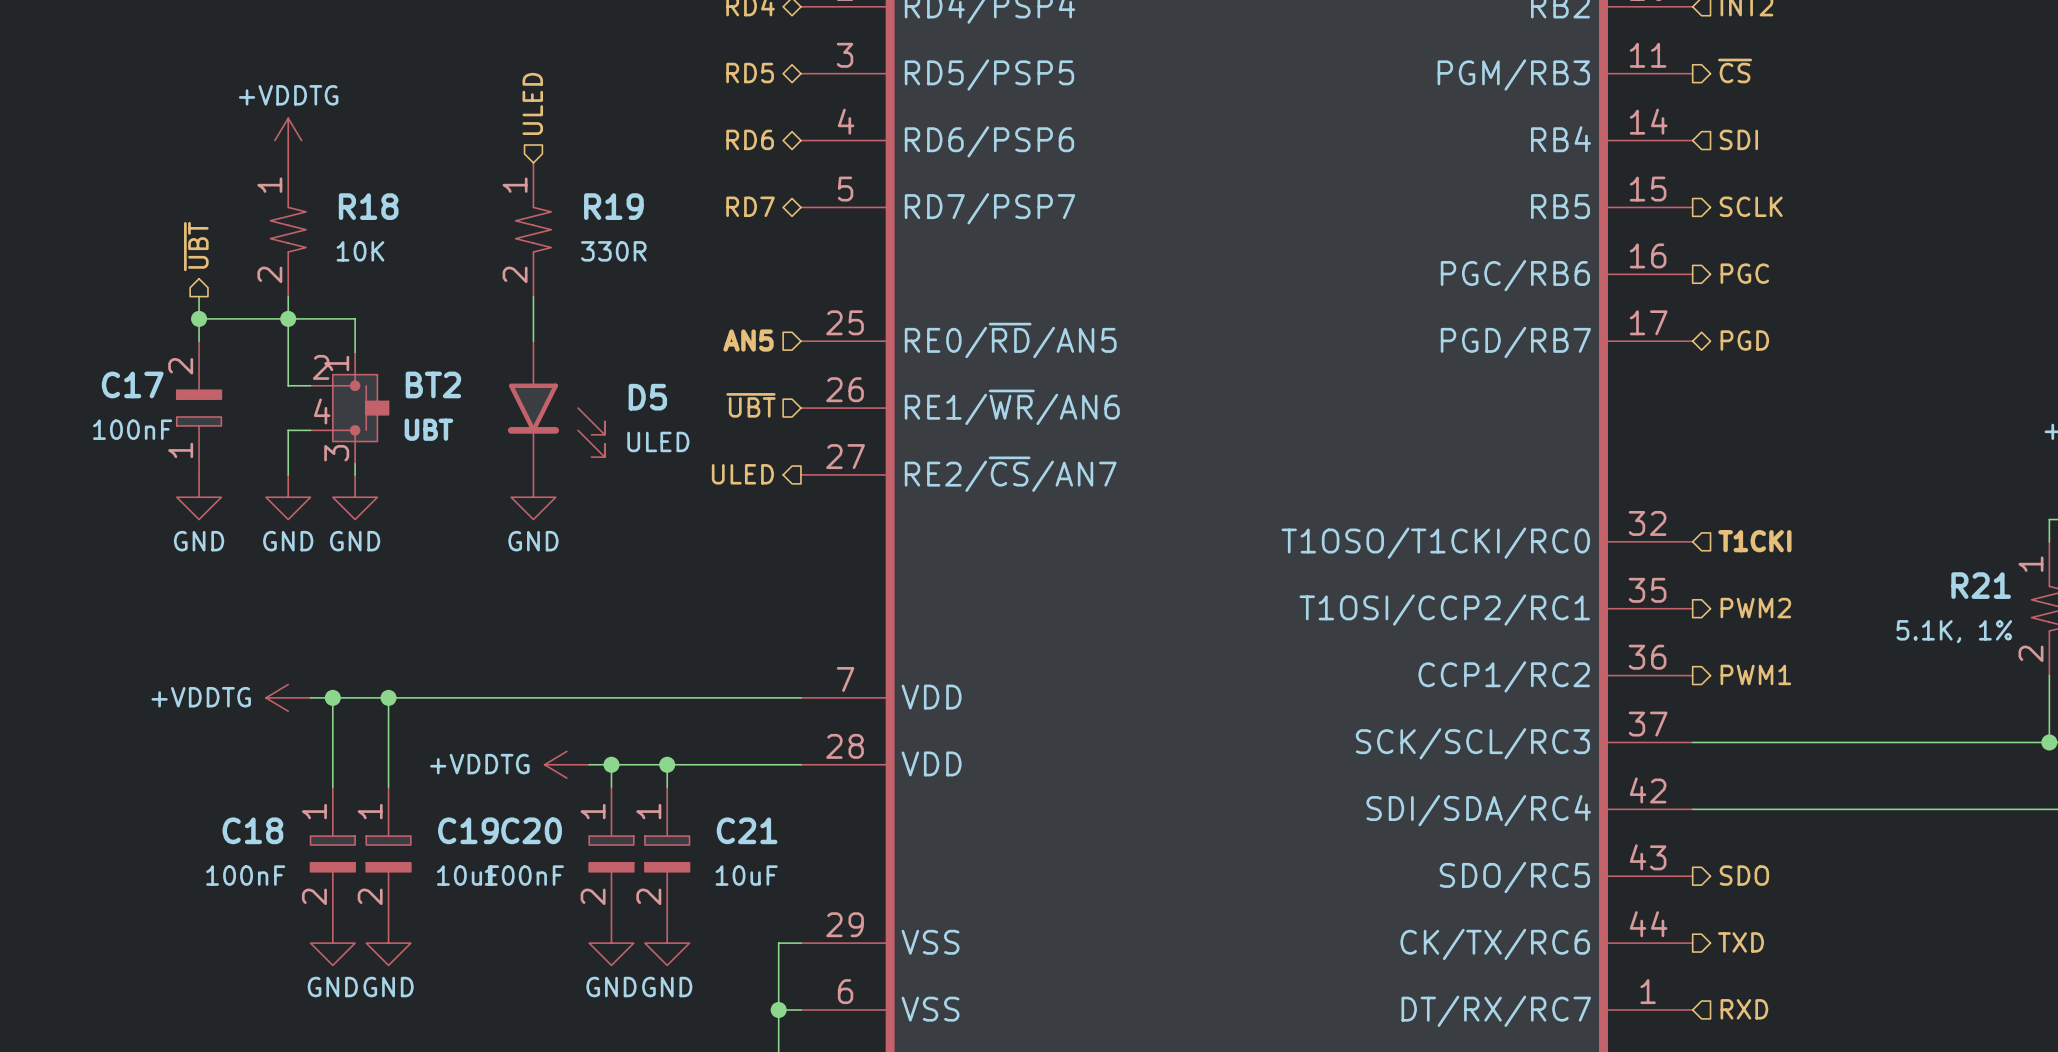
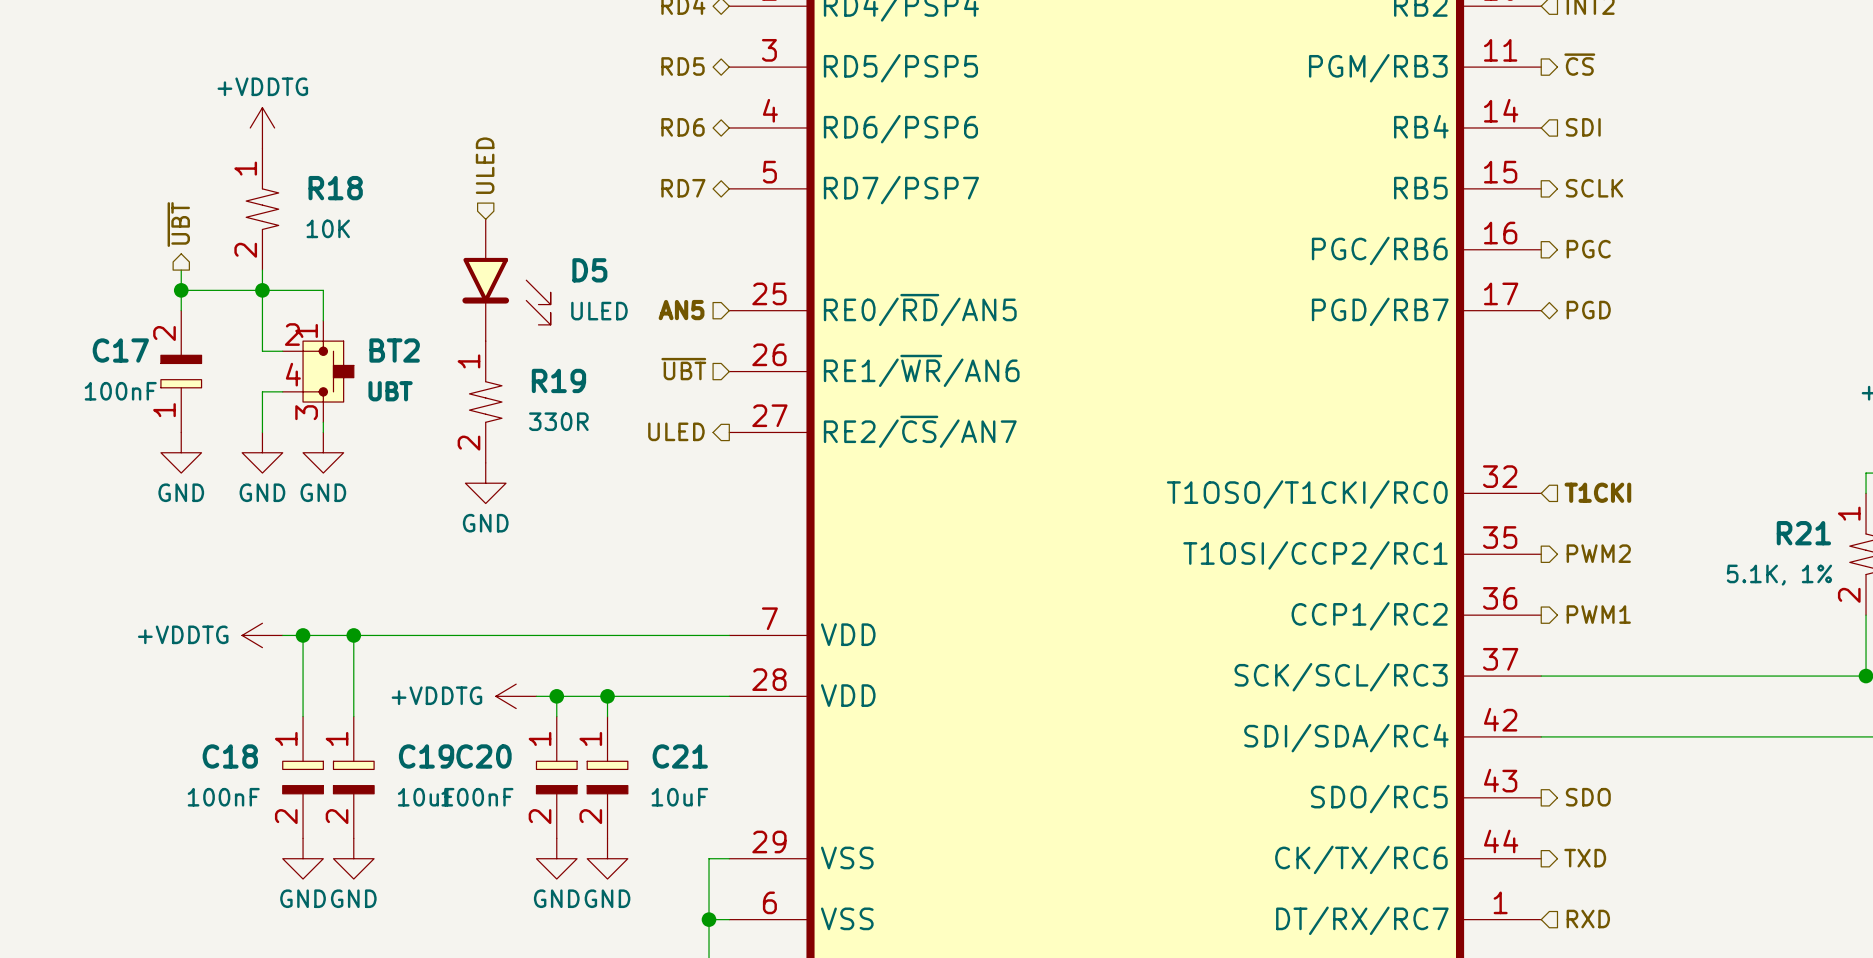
hierarchical label position: ULED (532, 103) -> ULED (485, 165)
R19 position: (533, 229) -> (485, 402)
D5 position: (556, 408) -> (506, 280)
power symbol position: GND (533, 497) -> GND (485, 483)

